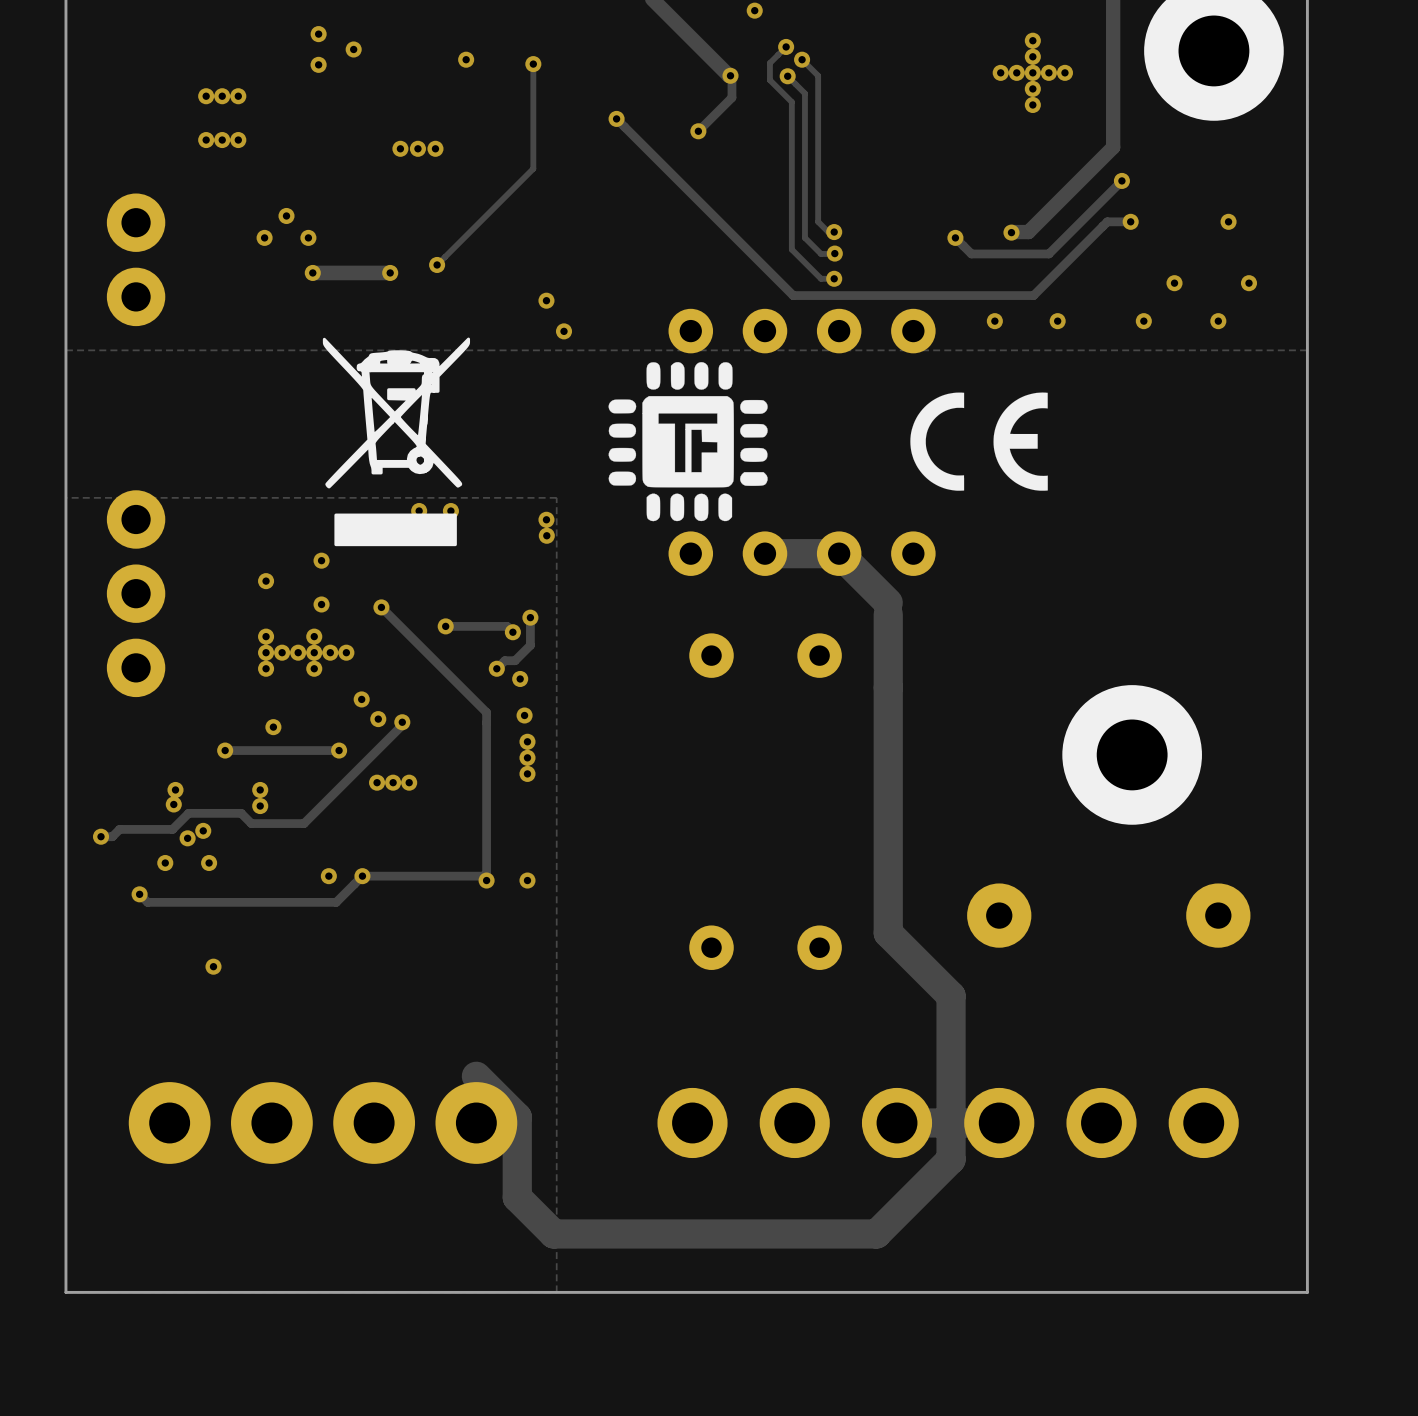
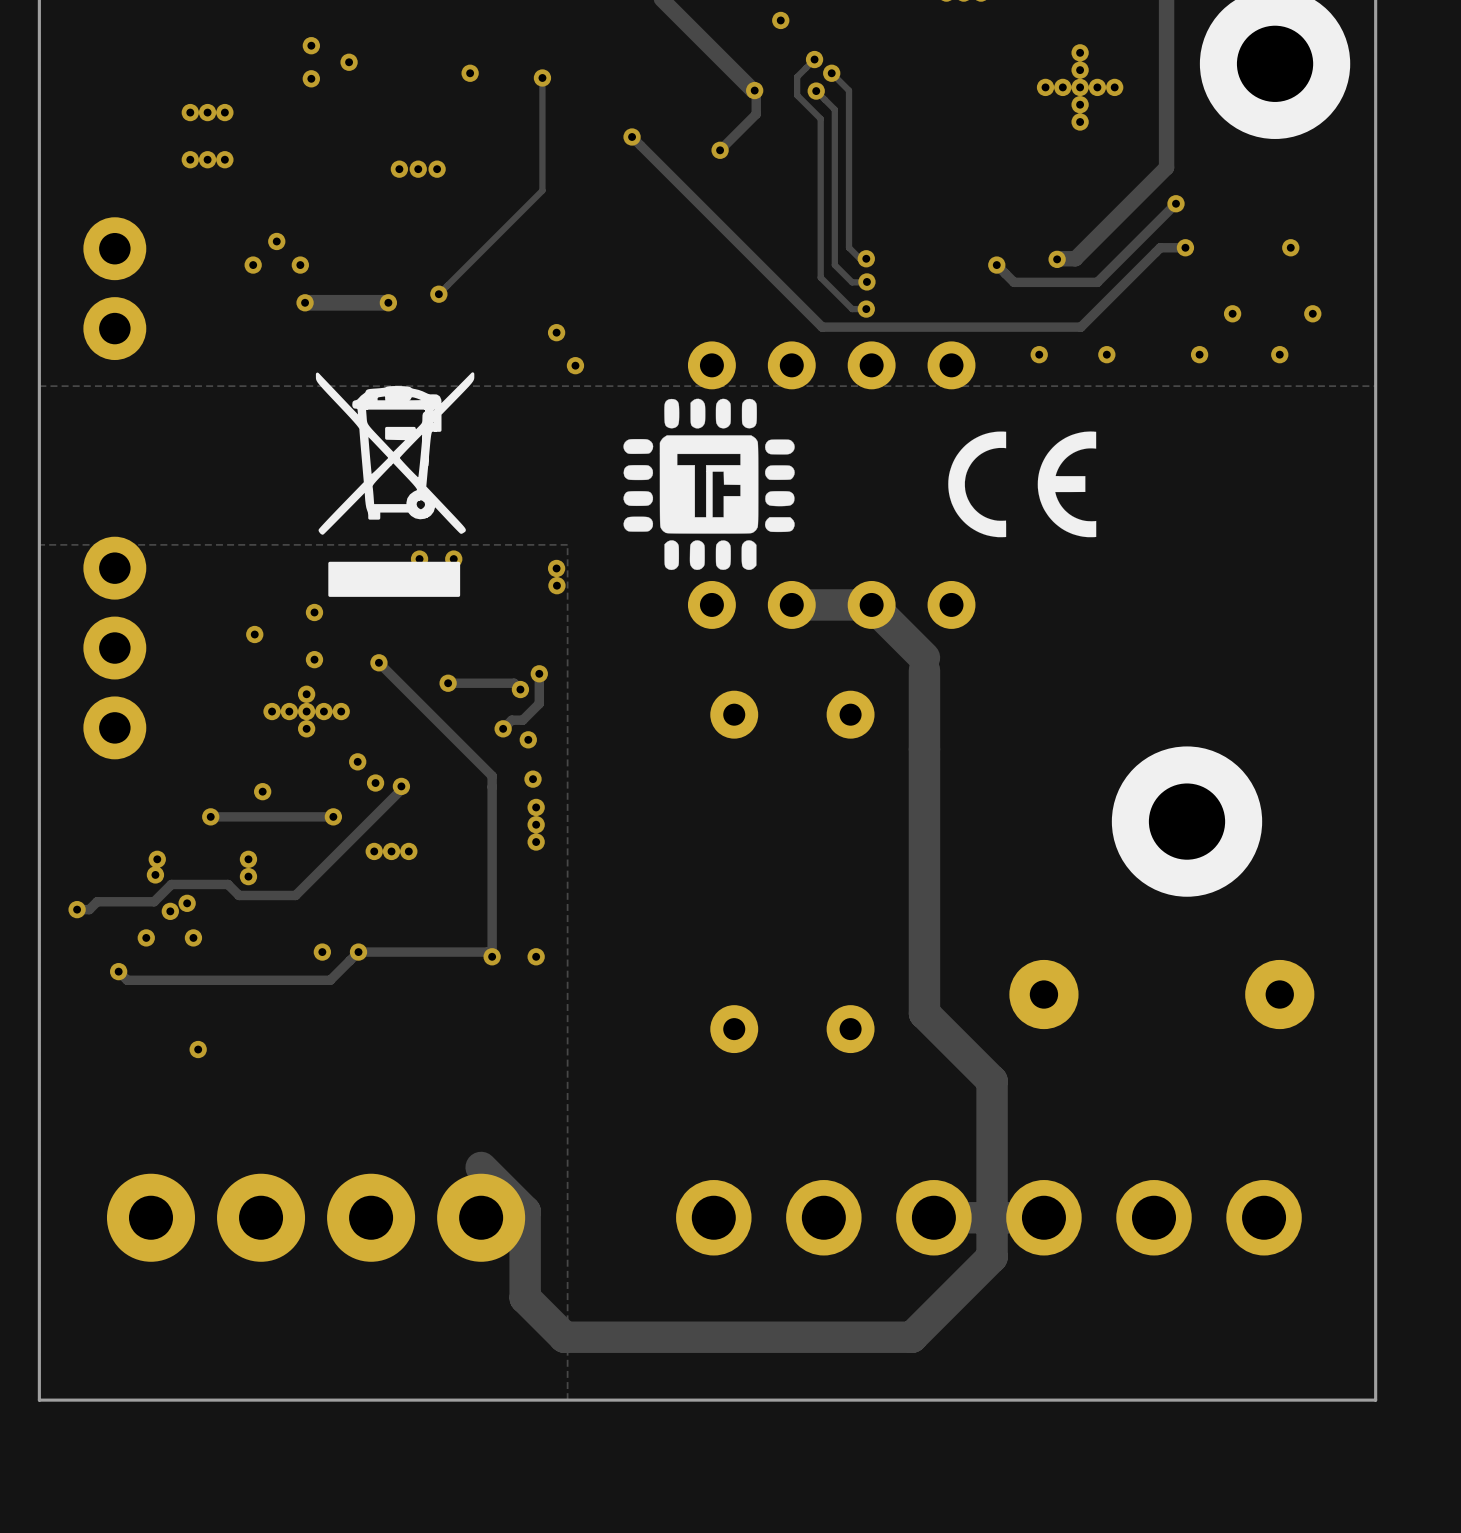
via: (266, 636) -> none
via: (266, 652) -> none
via: (266, 668) -> none

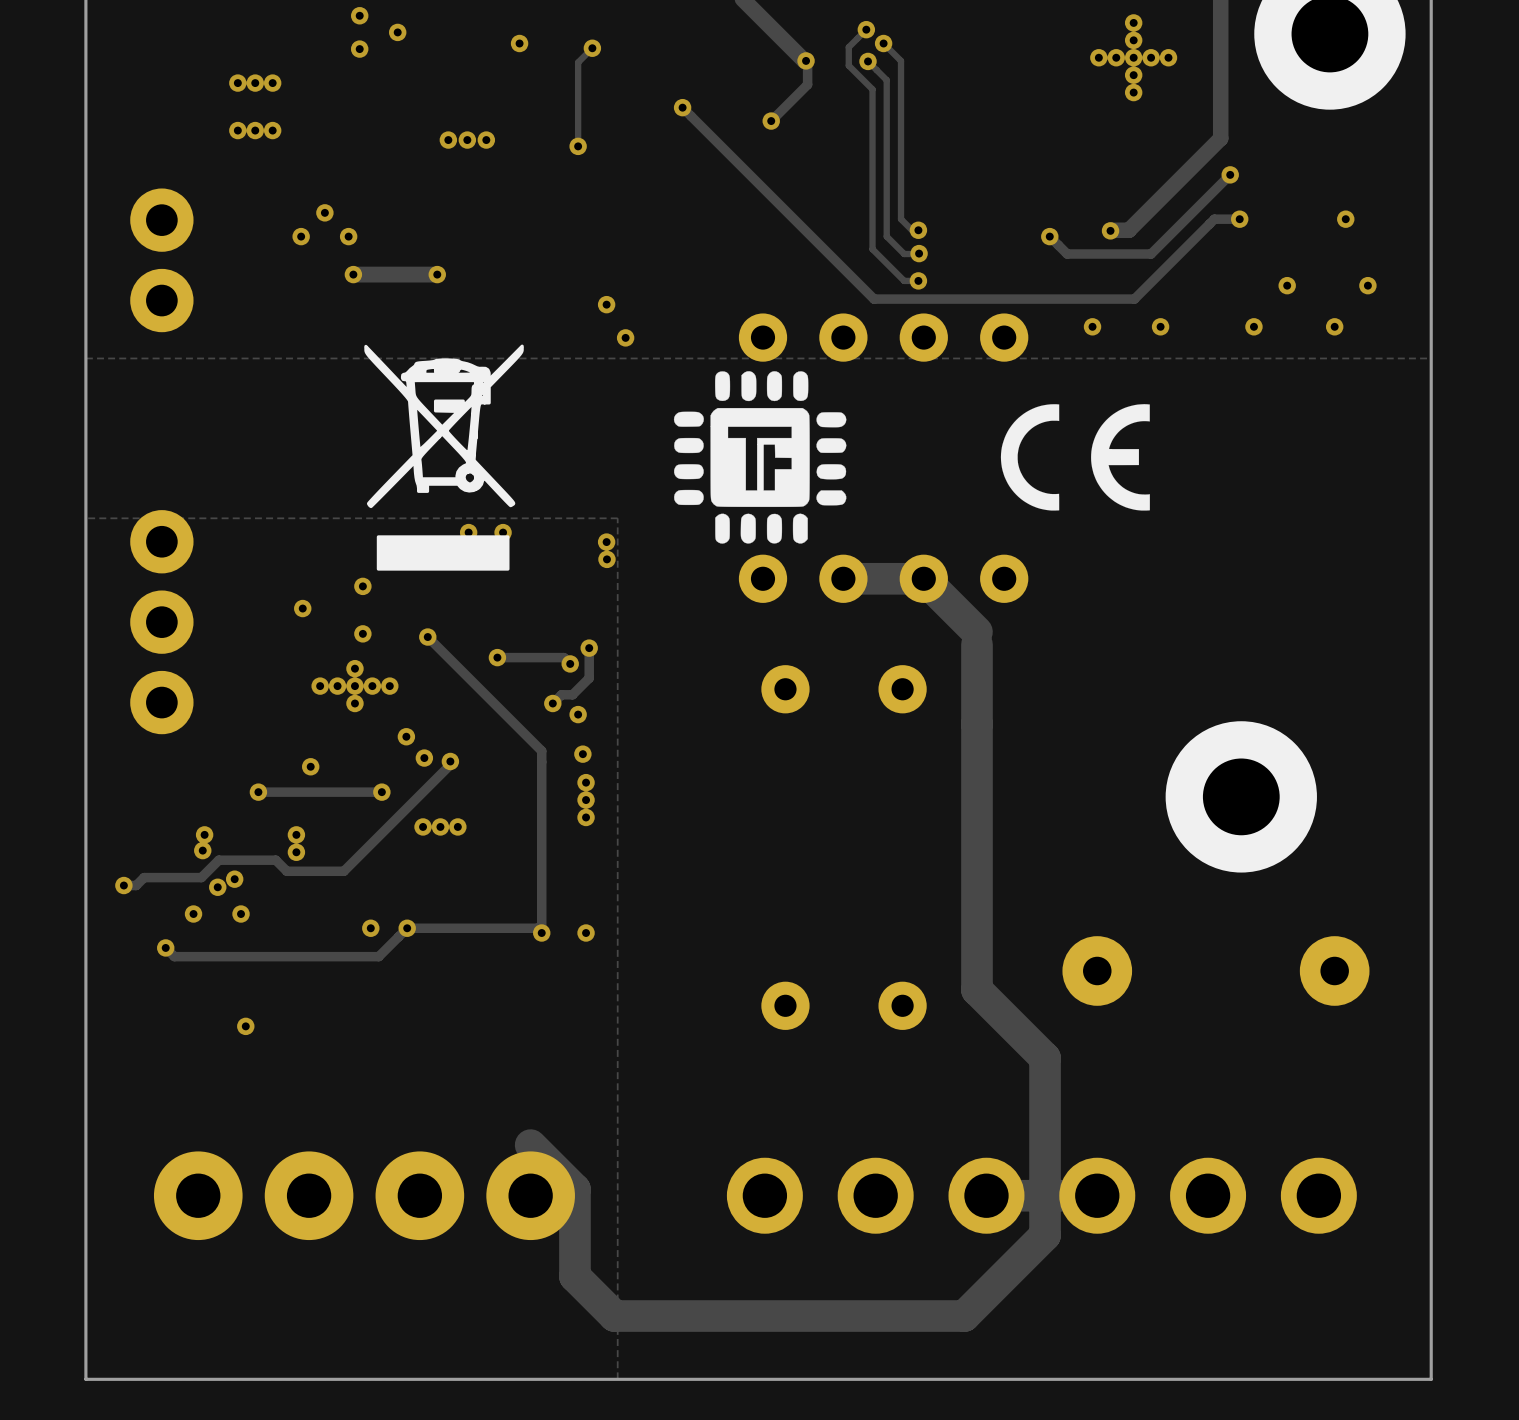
track: (542, 77) (542, 190) (438, 294) -> (592, 48) (578, 62) (578, 146)
via position: (438, 294) -> (578, 146)

